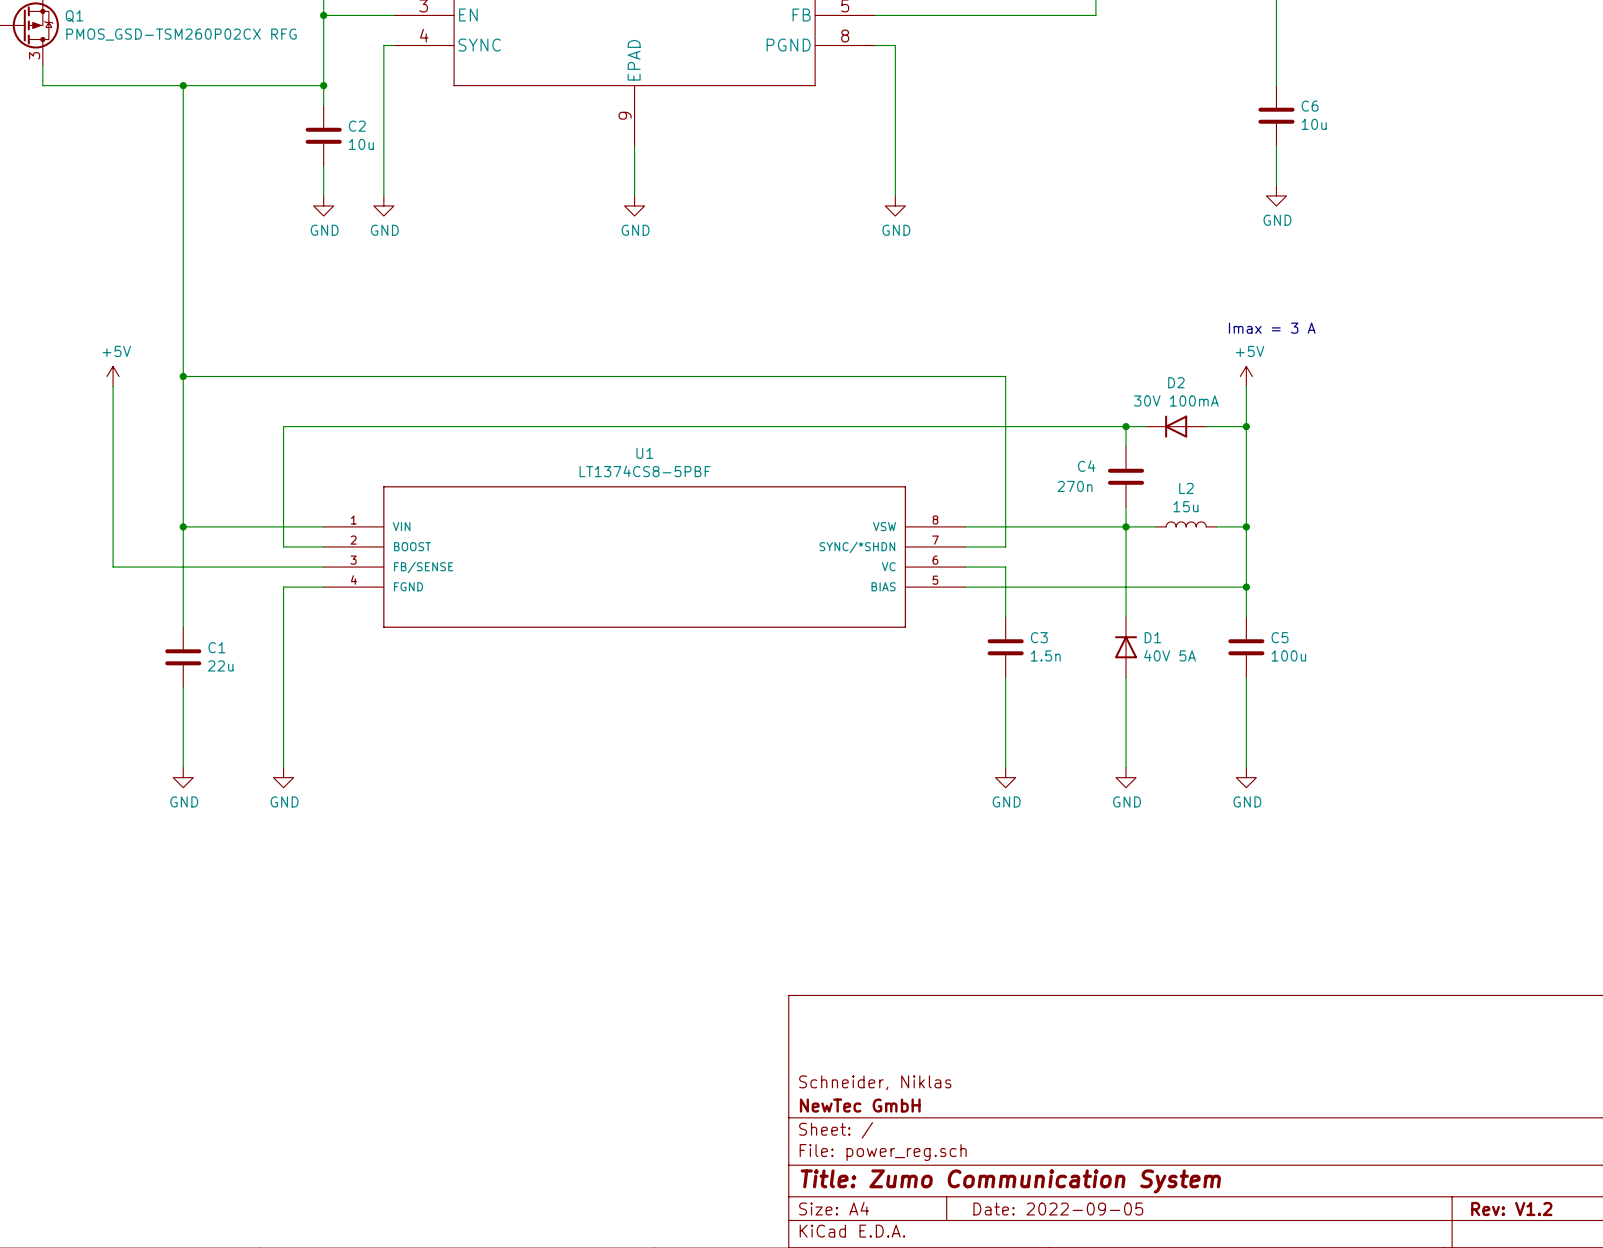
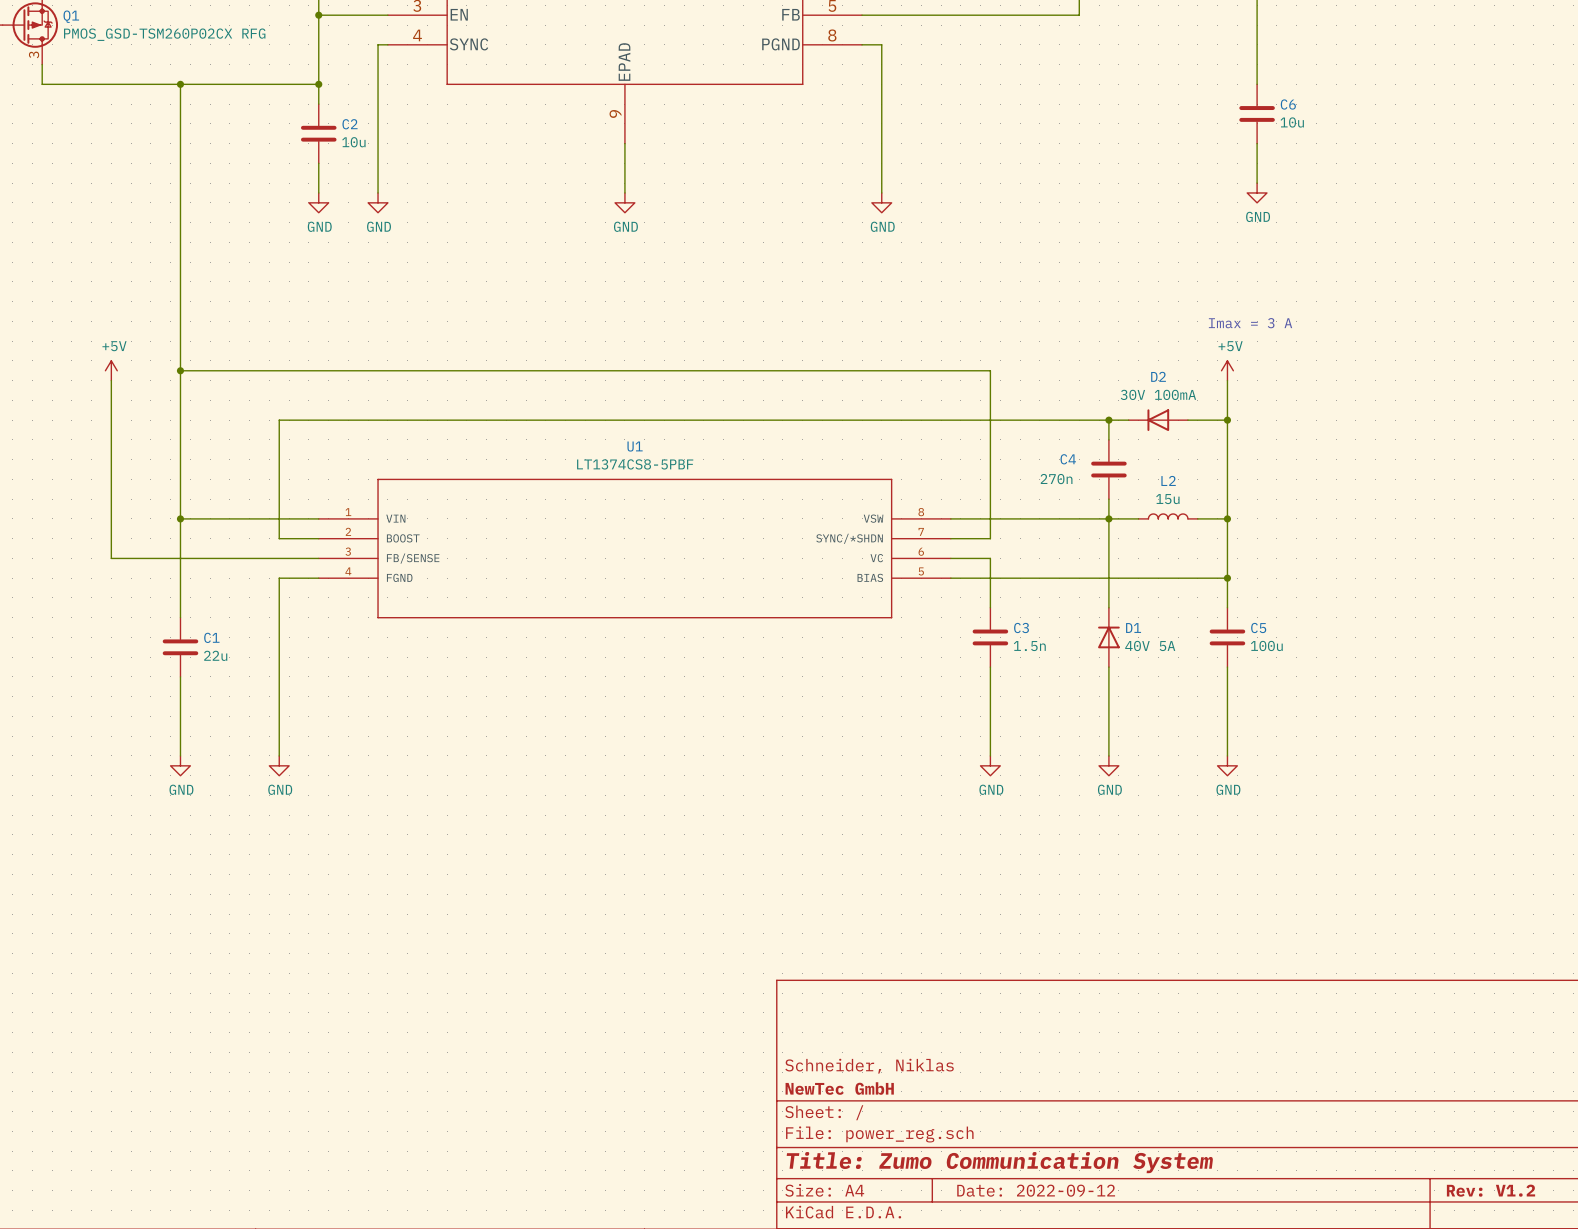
title block: Date: 2022-09-05 (1058, 1209) -> Date: 2022-09-12 (1036, 1190)

